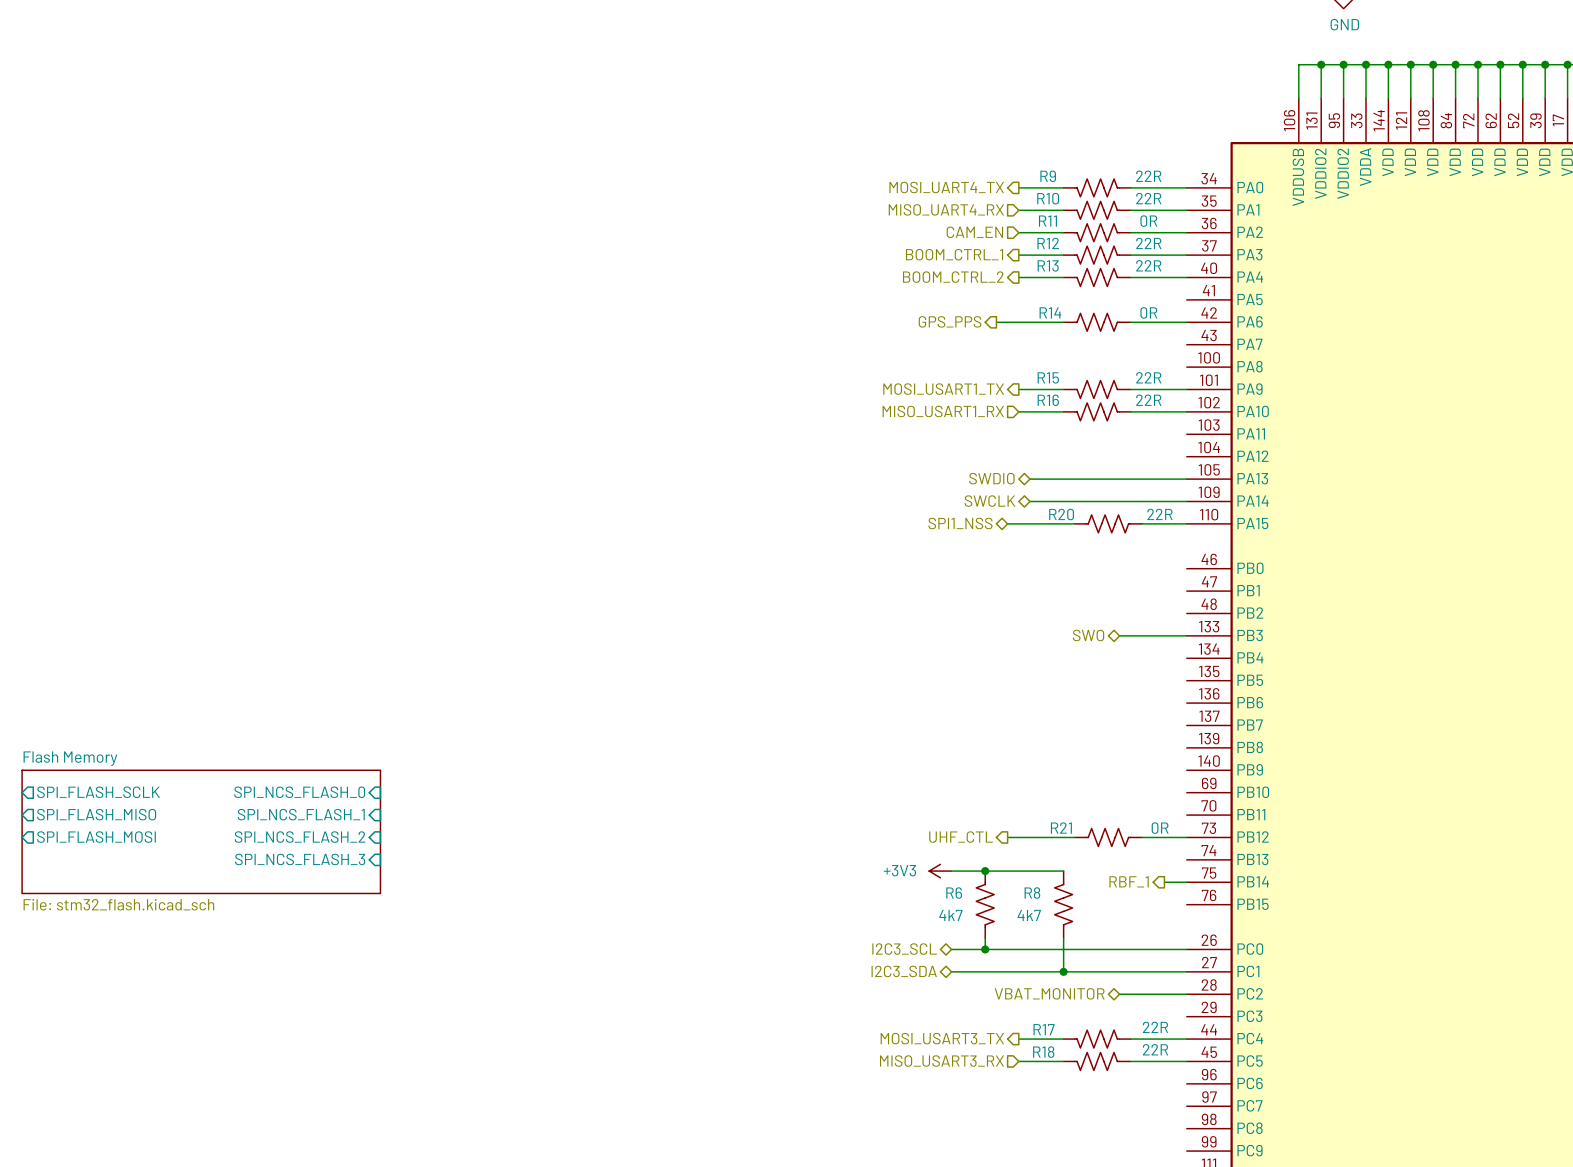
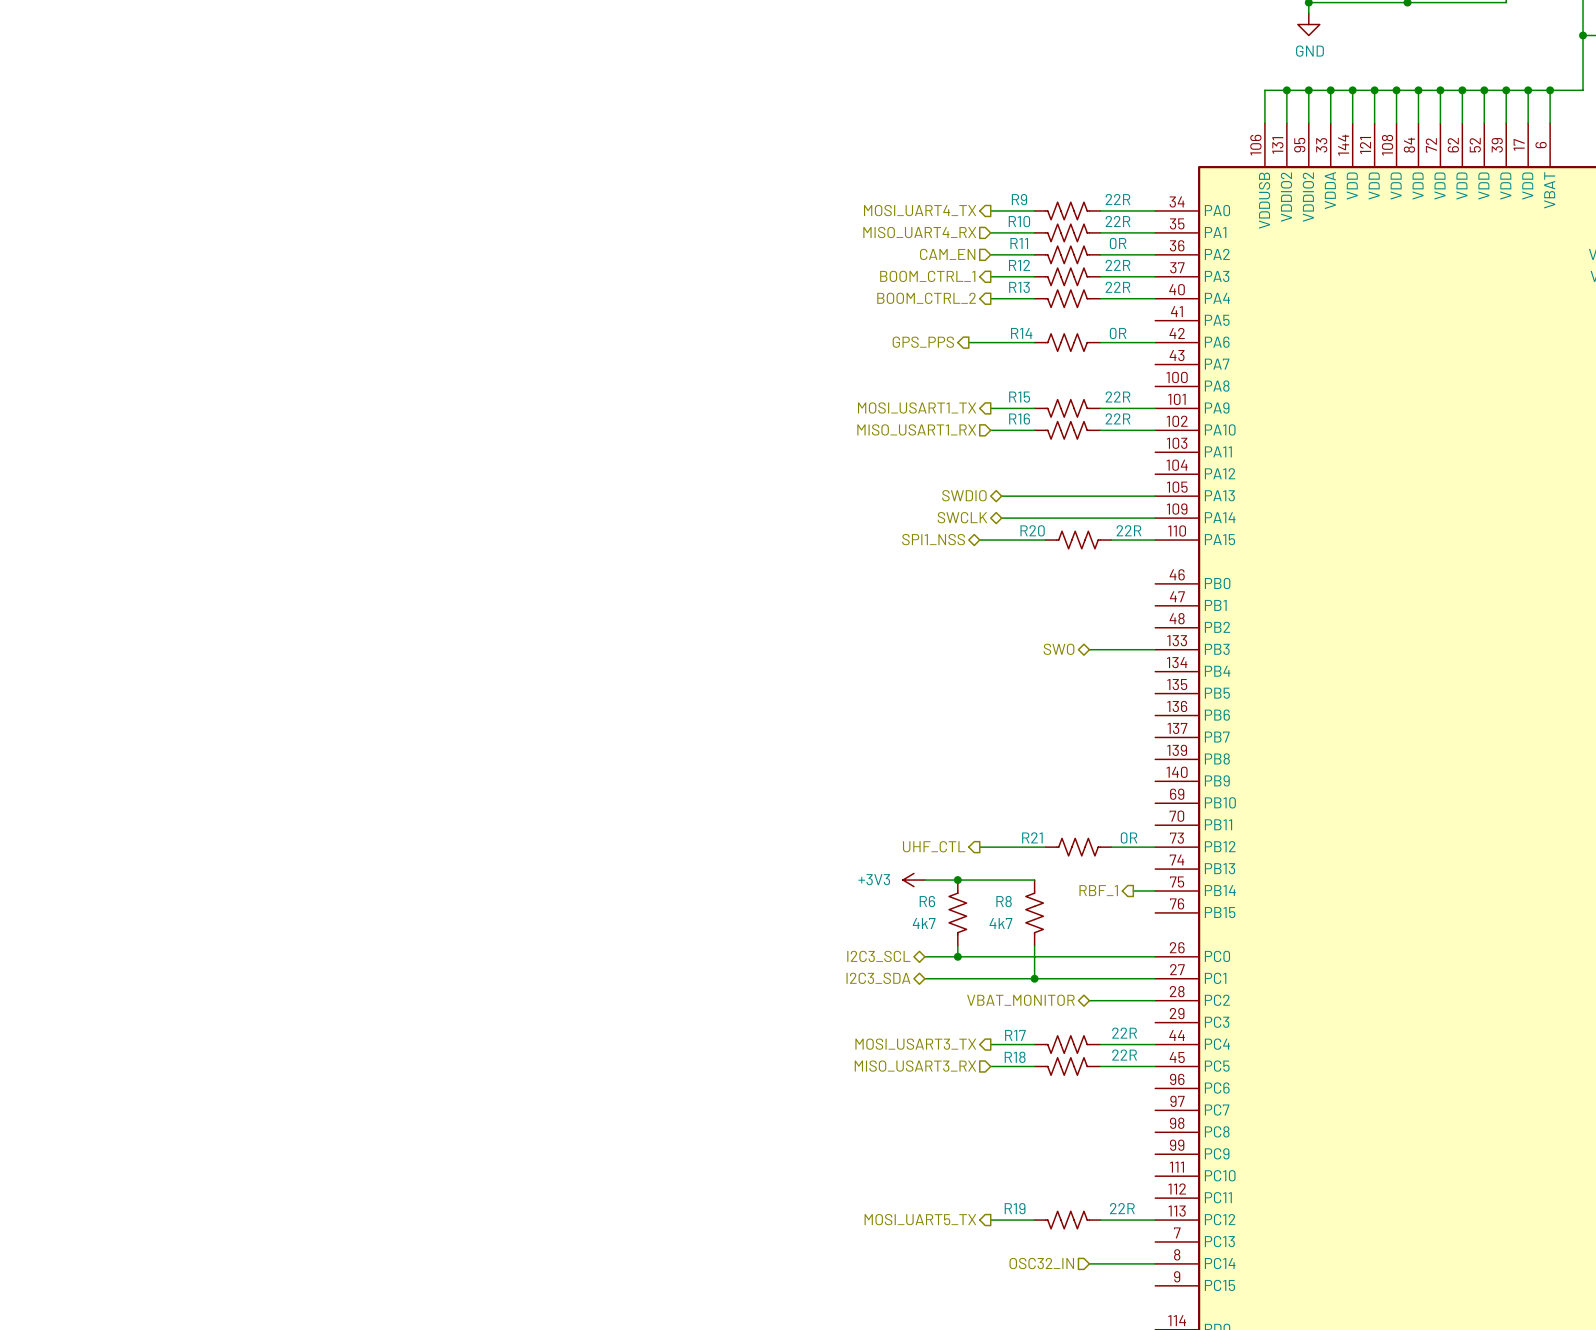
sheet pin: SPI_FLASH_SCLK (98, 792) -> none
sheet pin: SPI_NCS_FLASH_0 (299, 792) -> none
sheet pin: SPI_FLASH_MISO (96, 814) -> none
sheet pin: SPI_NCS_FLASH_1 (301, 814) -> none
sheet Flash Memory: File: stm32_flash.kicad_sch (201, 831) -> none
sheet pin: SPI_FLASH_MOSI (96, 837) -> none
sheet pin: SPI_NCS_FLASH_2 (300, 837) -> none
sheet pin: SPI_NCS_FLASH_3 (300, 859) -> none

